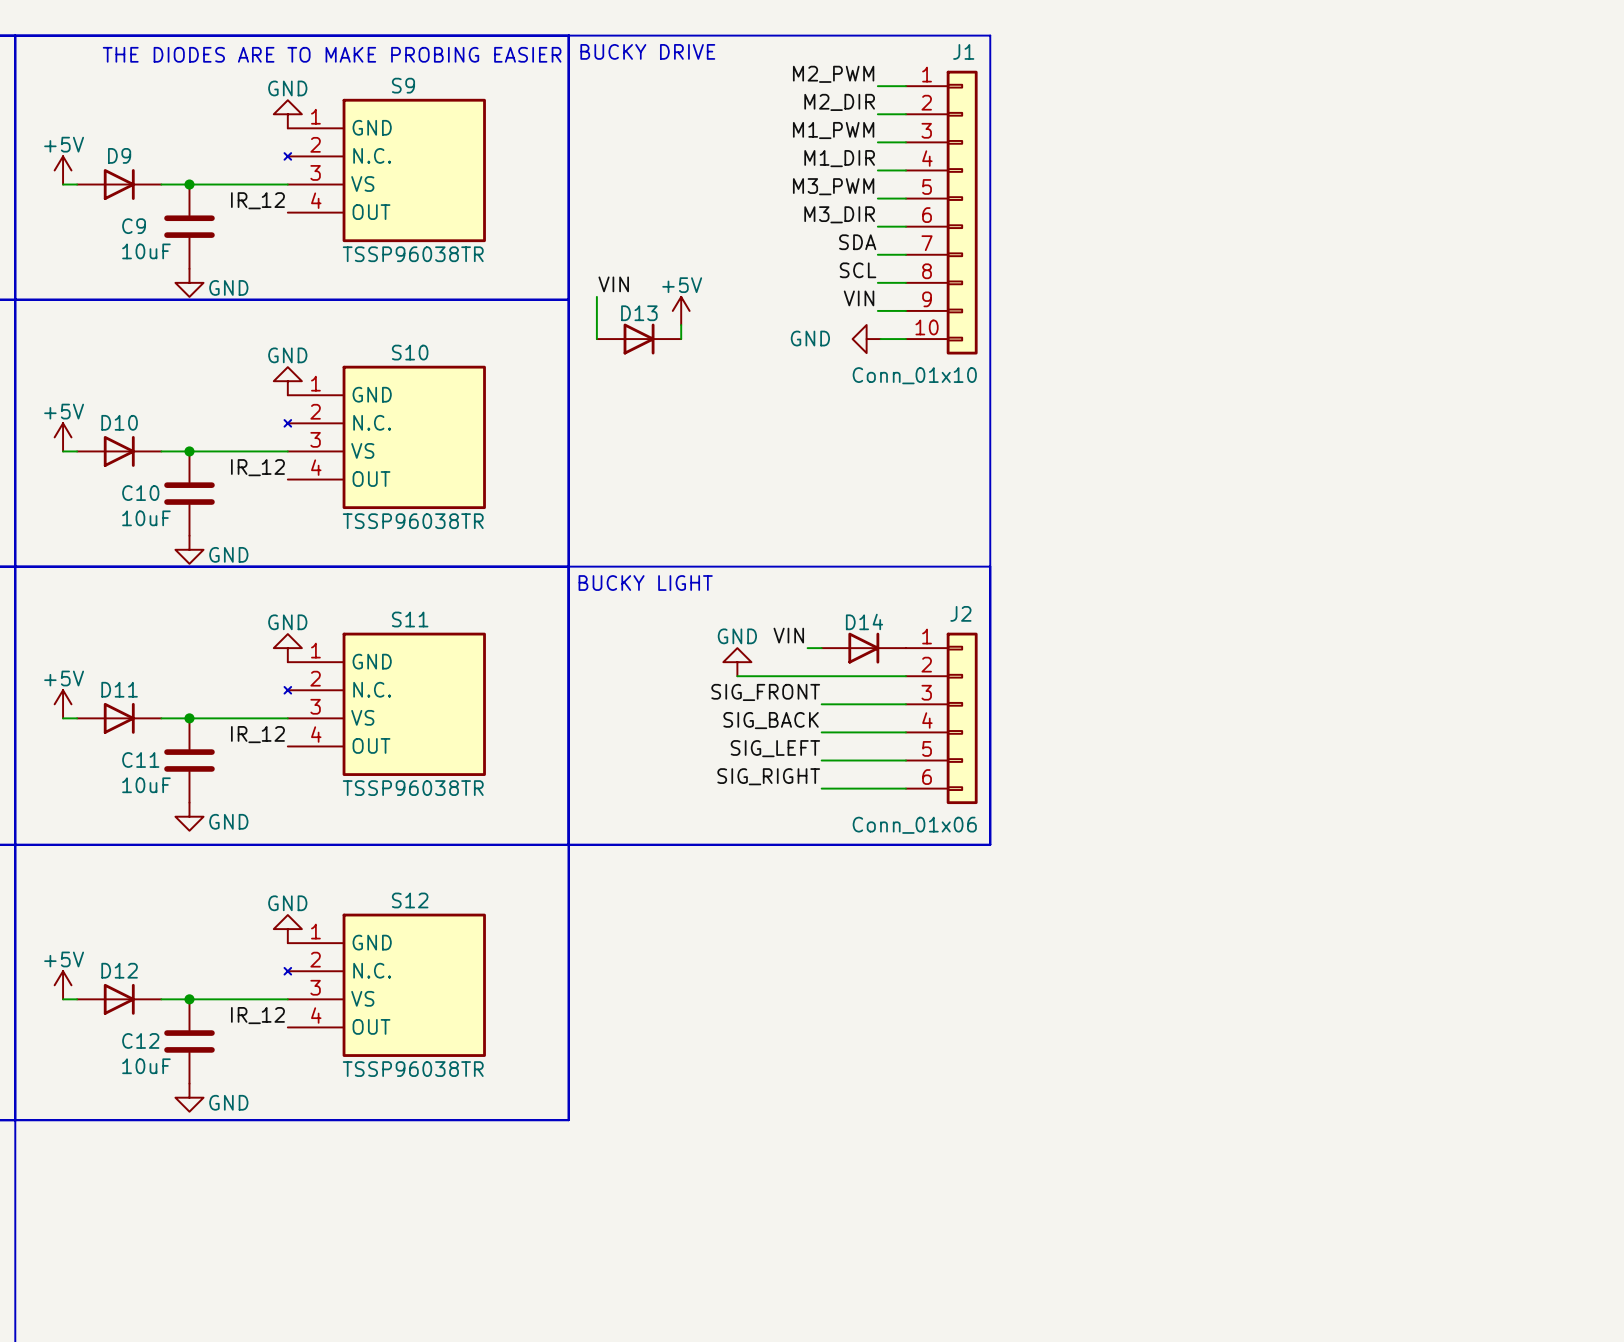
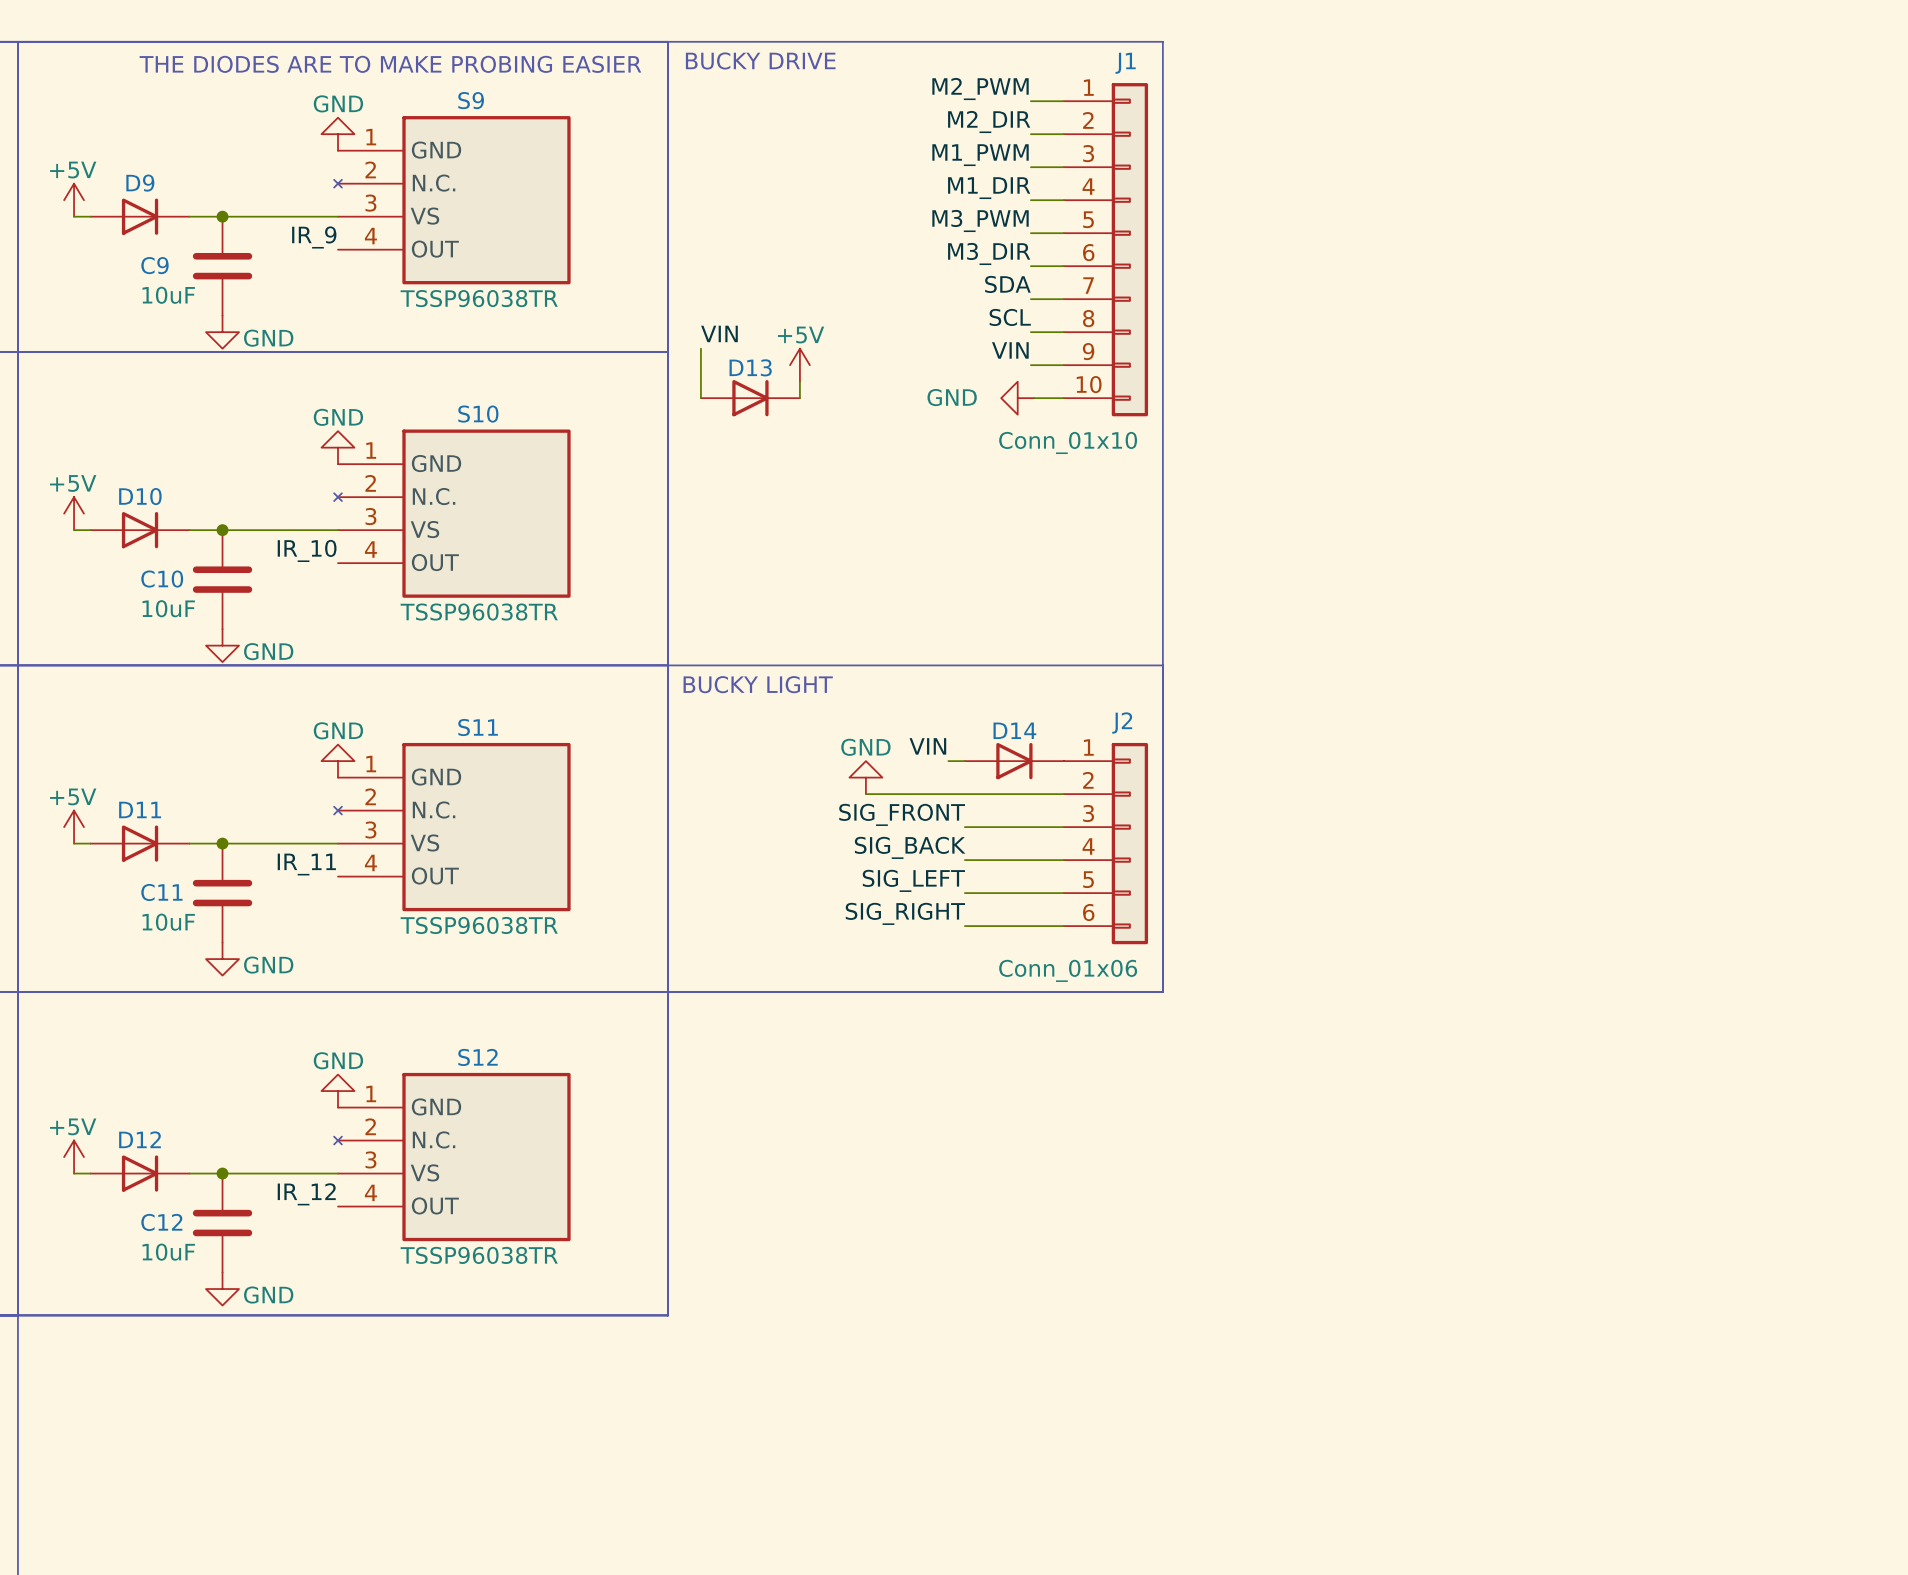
label: IR_12 (257, 200) -> IR_9 (314, 237)
label: IR_12 (257, 467) -> IR_10 (307, 550)
label: IR_12 (257, 734) -> IR_11 (306, 864)

